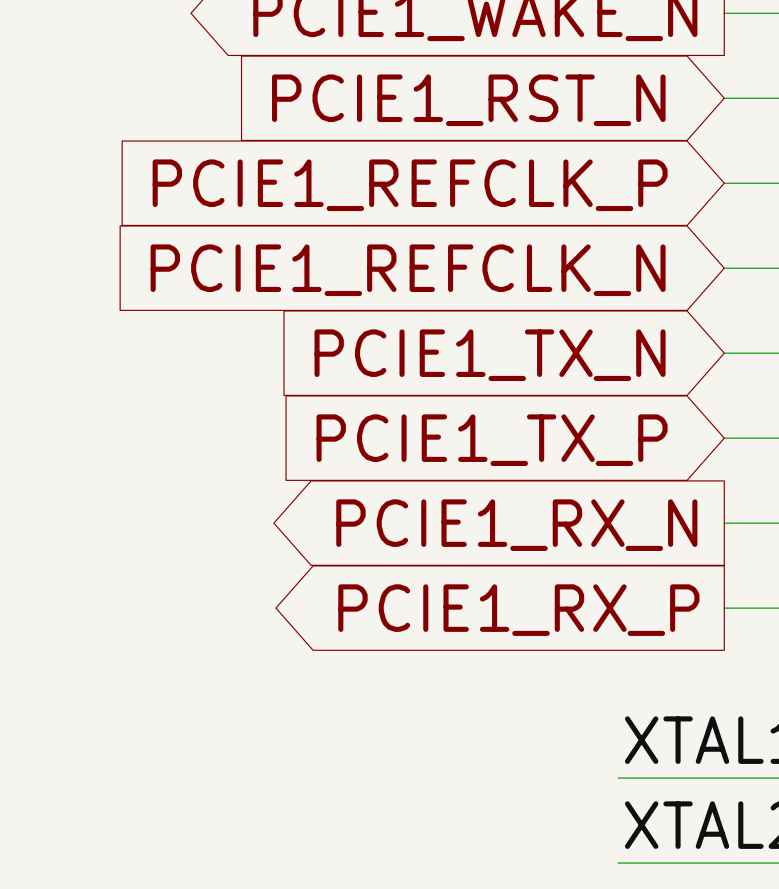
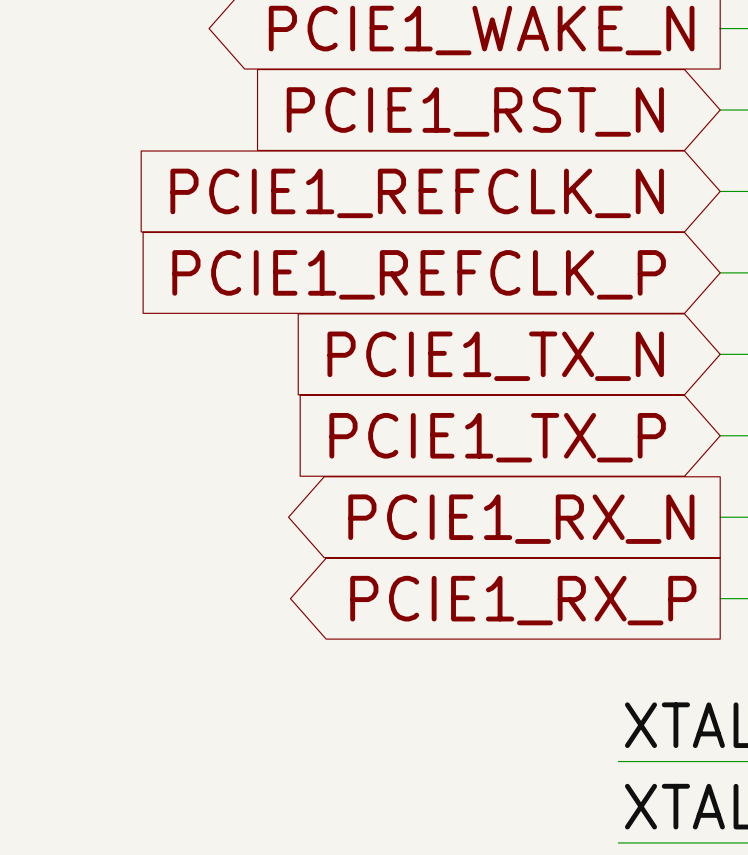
global label: PCIE1_REFCLK_P (410, 185) -> PCIE1_REFCLK_N (417, 193)
global label: PCIE1_REFCLK_N (408, 270) -> PCIE1_REFCLK_P (419, 274)

